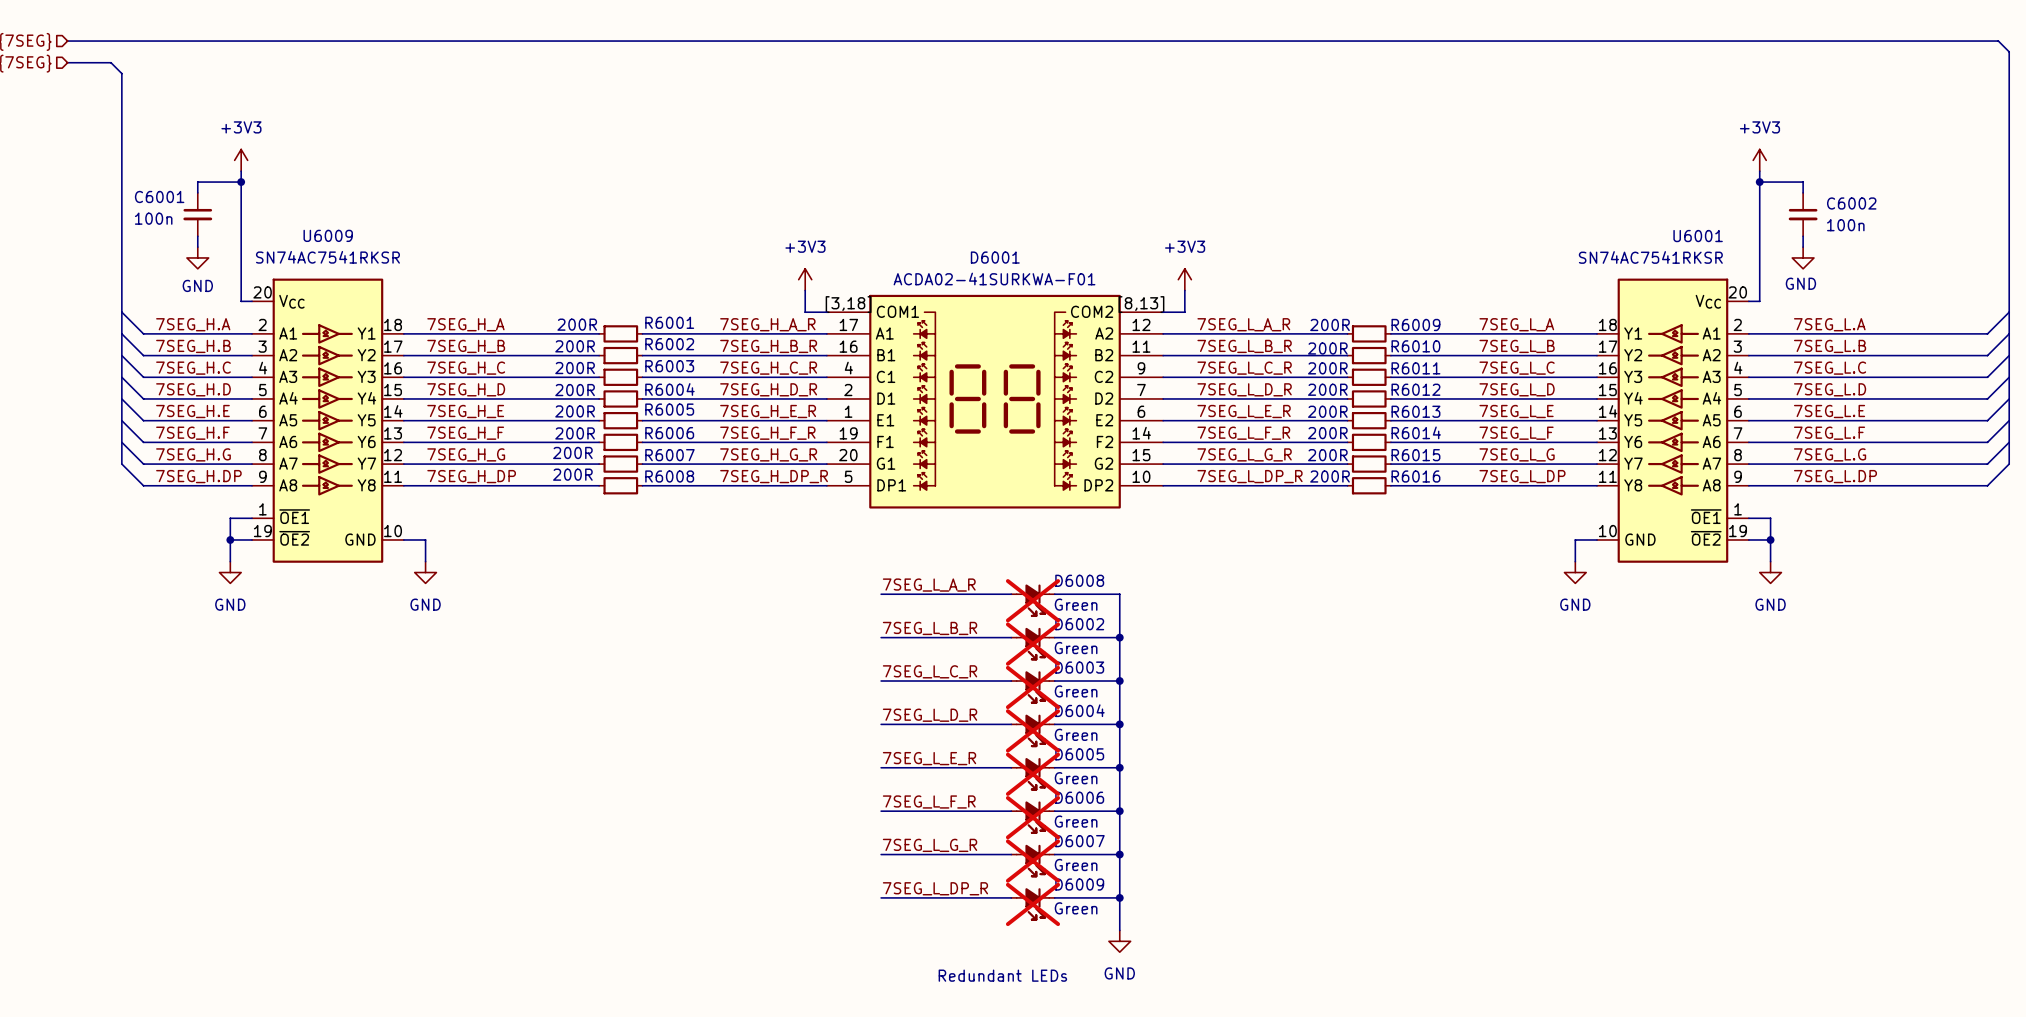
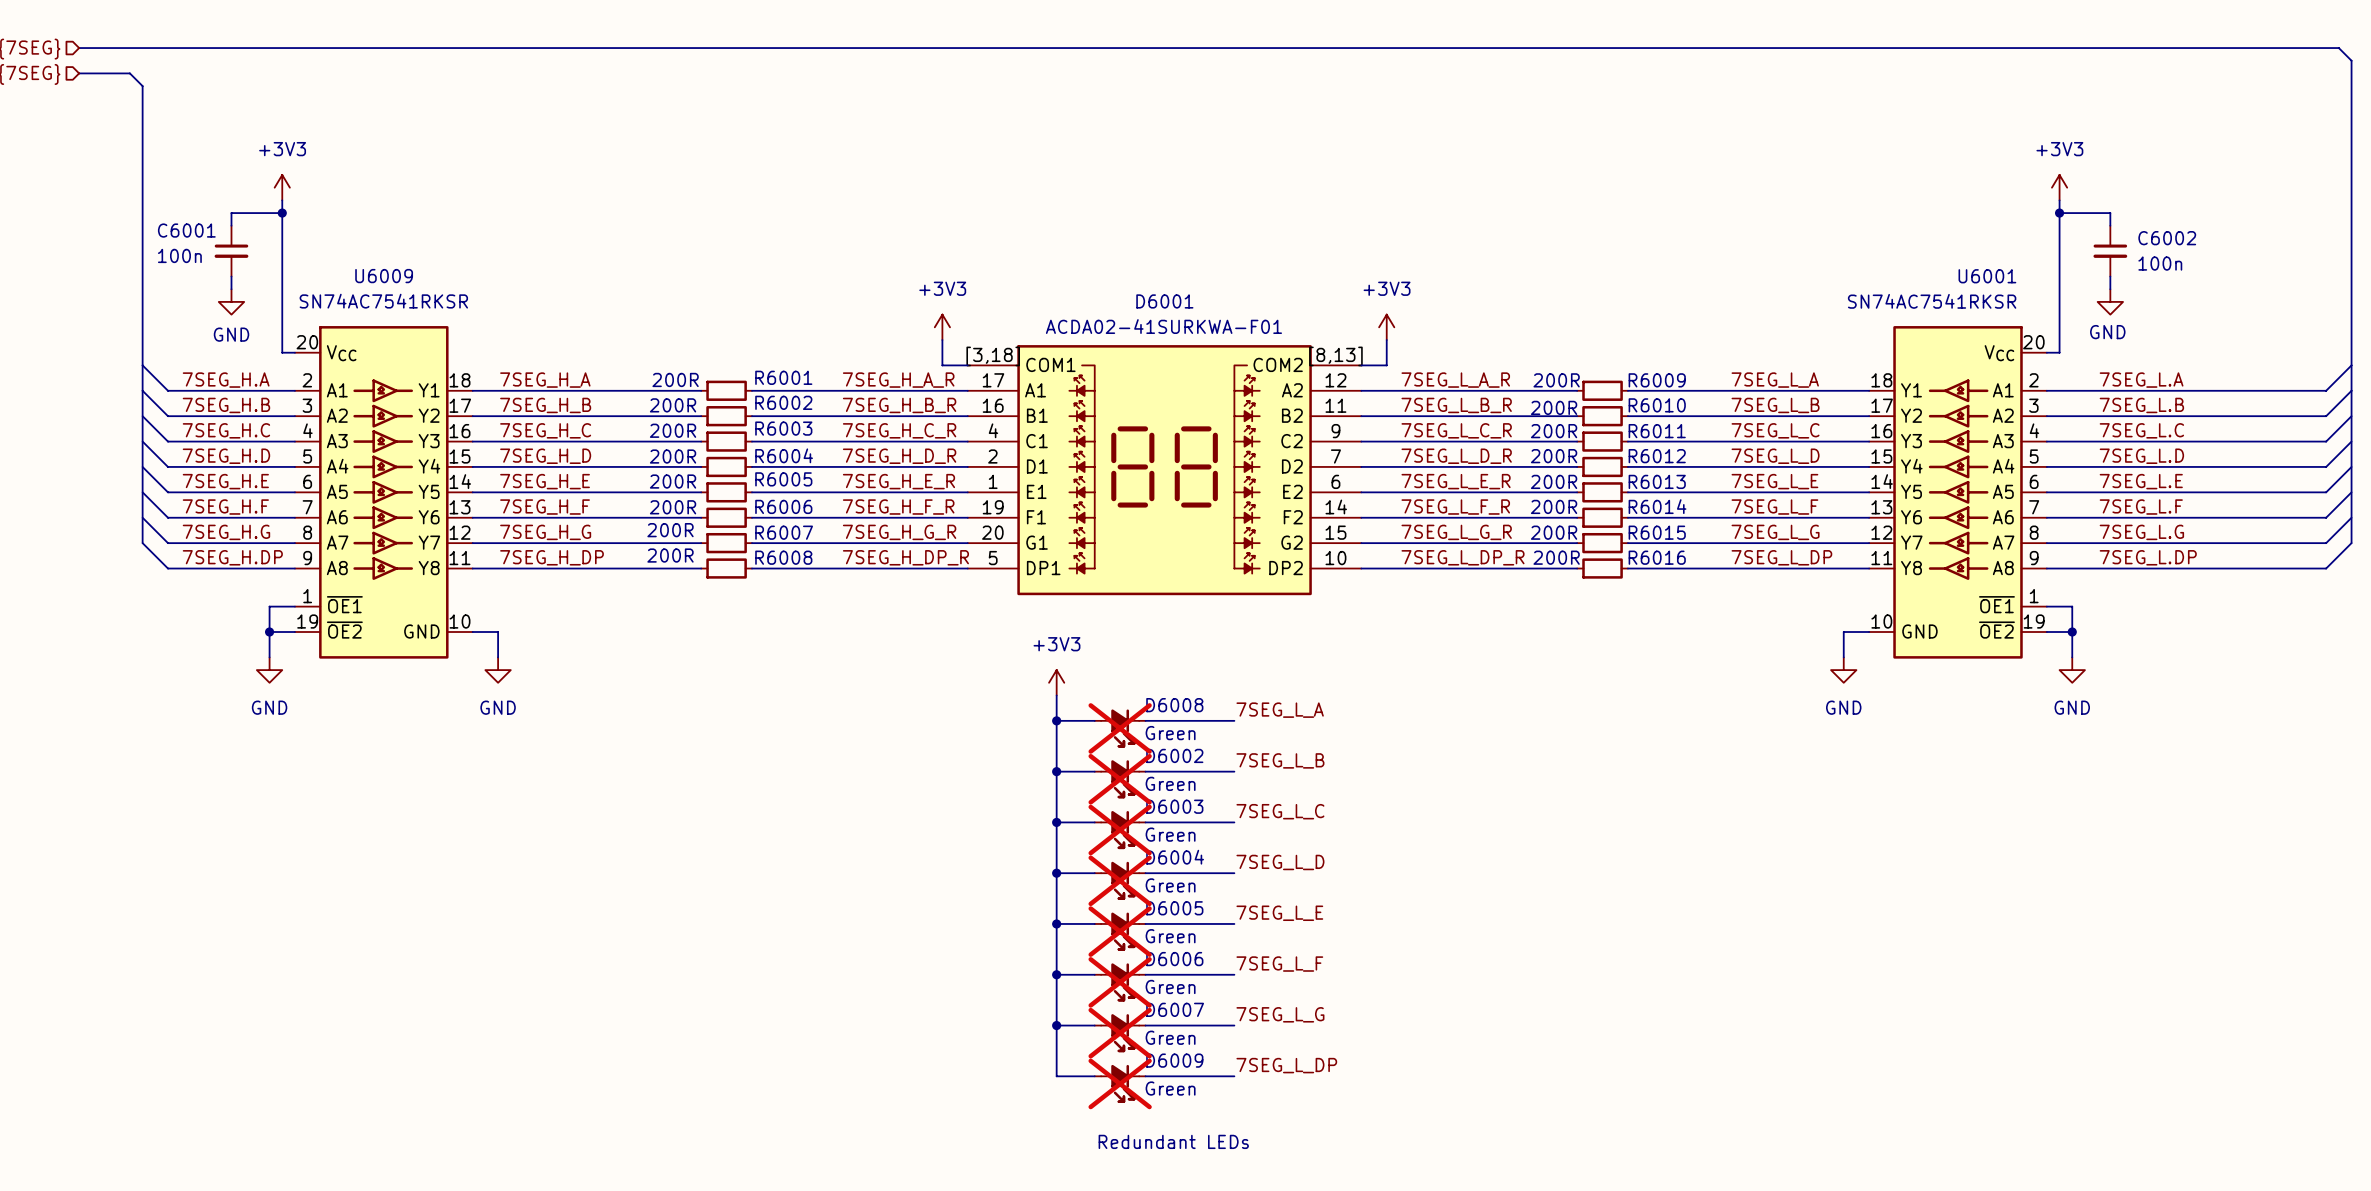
power symbol: none -> +3V3 (1056, 682)
label: 7SEG_L_A_R (929, 585) -> none
wire: (881, 594) (1011, 594) -> none
wire: none -> (1056, 695) (1056, 1076) (1094, 1076)
wire: (1054, 594) (1119, 594) (1119, 930) -> none
D6008 position: (1032, 600) -> (1120, 728)
label: none -> 7SEG_L_A (1280, 710)
wire: none -> (1056, 720) (1094, 720)
junction: none -> (1056, 720)
wire: none -> (1145, 720) (1234, 720)
label: 7SEG_L_B_R (930, 628) -> none
wire: (881, 637) (1011, 637) -> none
wire: (1054, 637) (1119, 637) -> none
junction: (1119, 637) -> none
D6002 position: (1032, 644) -> (1120, 779)
label: none -> 7SEG_L_B (1280, 760)
wire: none -> (1056, 771) (1094, 771)
junction: none -> (1056, 771)
wire: none -> (1145, 771) (1234, 771)
label: 7SEG_L_C_R (930, 671) -> none
wire: (881, 681) (1011, 681) -> none
wire: (1054, 681) (1119, 681) -> none
junction: (1119, 681) -> none
D6003 position: (1032, 687) -> (1120, 830)
label: none -> 7SEG_L_C (1280, 811)
wire: none -> (1056, 822) (1094, 822)
junction: none -> (1056, 822)
wire: none -> (1145, 822) (1234, 822)
label: 7SEG_L_D_R (930, 715) -> none
wire: (881, 724) (1011, 724) -> none
wire: (1054, 724) (1119, 724) -> none
junction: (1119, 724) -> none
D6004 position: (1032, 730) -> (1120, 880)
label: none -> 7SEG_L_D (1280, 862)
wire: none -> (1056, 873) (1094, 873)
junction: none -> (1056, 873)
wire: none -> (1145, 873) (1234, 873)
label: 7SEG_L_E_R (929, 758) -> none
wire: (881, 767) (1011, 767) -> none
wire: (1054, 767) (1119, 767) -> none
junction: (1119, 767) -> none
D6005 position: (1032, 774) -> (1120, 931)
label: none -> 7SEG_L_E (1279, 913)
wire: none -> (1056, 923) (1094, 923)
junction: none -> (1056, 923)
wire: none -> (1145, 923) (1234, 923)
label: 7SEG_L_F_R (929, 802) -> none
wire: (881, 811) (1011, 811) -> none
wire: (1054, 811) (1119, 811) -> none
junction: (1119, 811) -> none
D6006 position: (1032, 817) -> (1120, 982)
label: none -> 7SEG_L_F (1279, 964)
wire: none -> (1056, 974) (1094, 974)
junction: none -> (1056, 974)
wire: none -> (1145, 974) (1234, 974)
label: 7SEG_L_G_R (930, 845) -> none
wire: (881, 854) (1011, 854) -> none
wire: (1054, 854) (1119, 854) -> none
junction: (1119, 854) -> none
D6007 position: (1032, 861) -> (1120, 1033)
label: none -> 7SEG_L_G (1280, 1014)
wire: none -> (1056, 1025) (1094, 1025)
junction: none -> (1056, 1025)
wire: none -> (1145, 1025) (1234, 1025)
label: 7SEG_L_DP_R (935, 888) -> none
wire: (881, 897) (1011, 897) -> none
wire: (1054, 897) (1119, 897) -> none
junction: (1119, 897) -> none
D6009 position: (1032, 904) -> (1120, 1083)
label: none -> 7SEG_L_DP (1286, 1065)
wire: none -> (1145, 1076) (1234, 1076)
power symbol: GND (1119, 941) -> none

